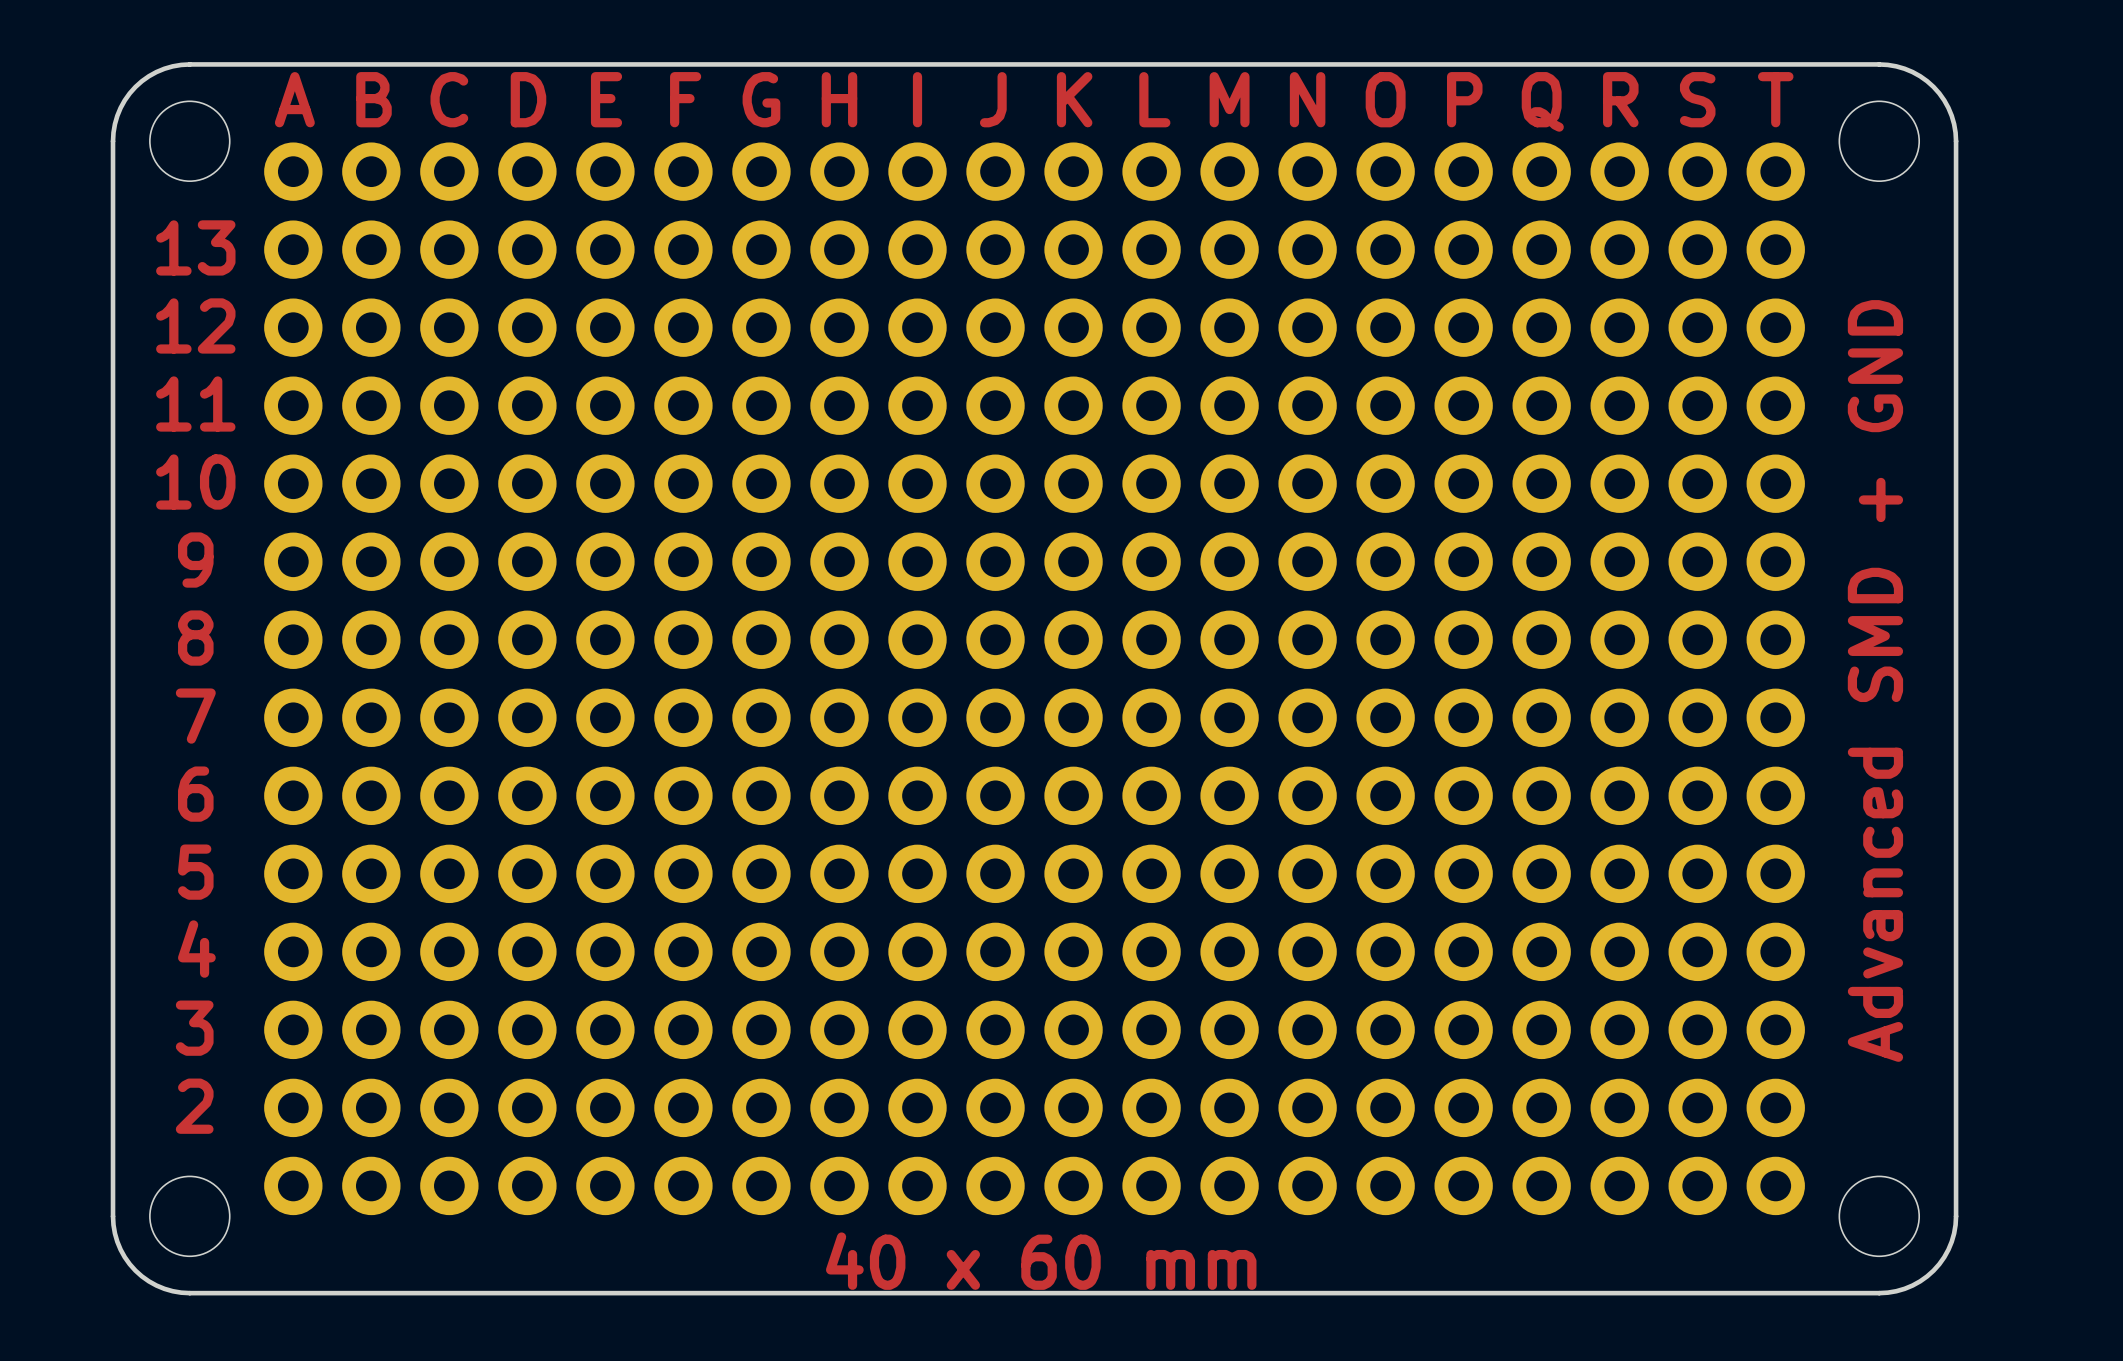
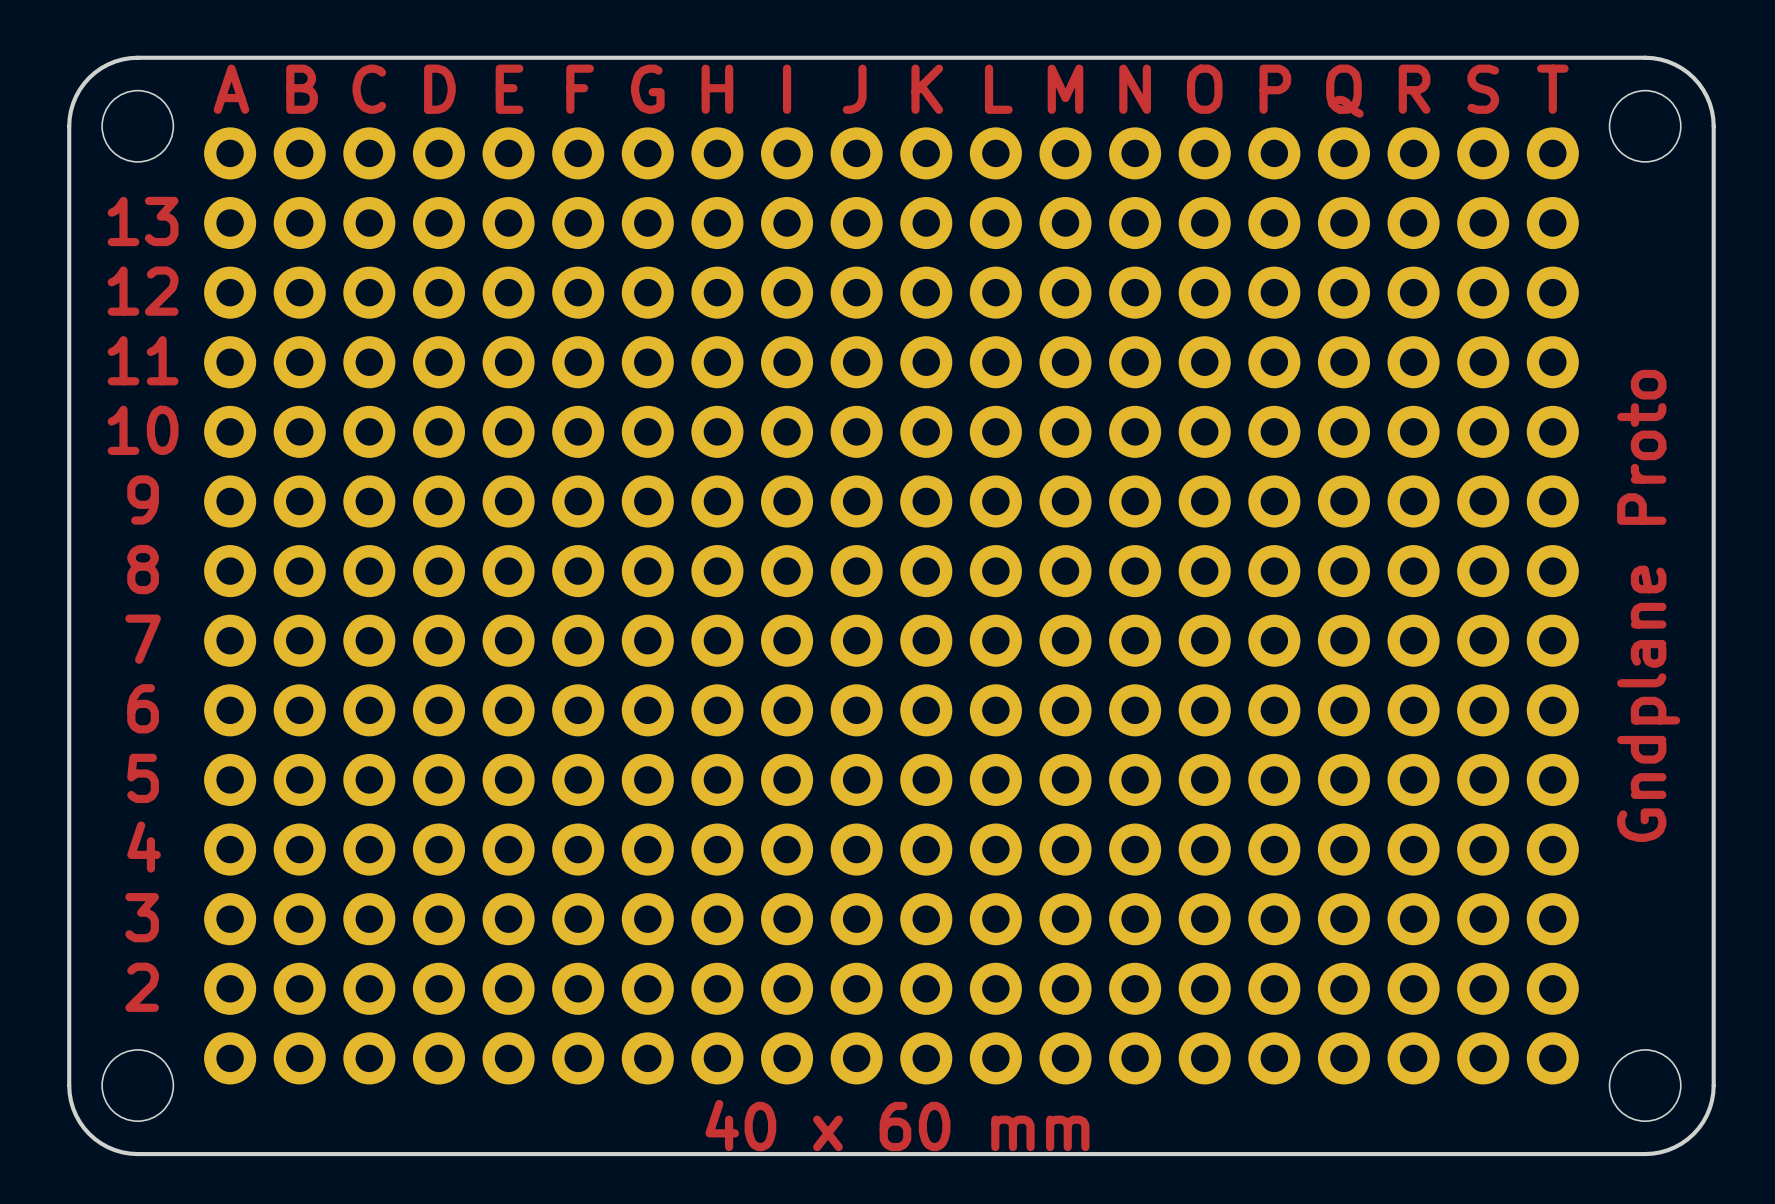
text: Advanced SMD + GND (1875, 680) -> Gndplane Proto (1648, 605)

